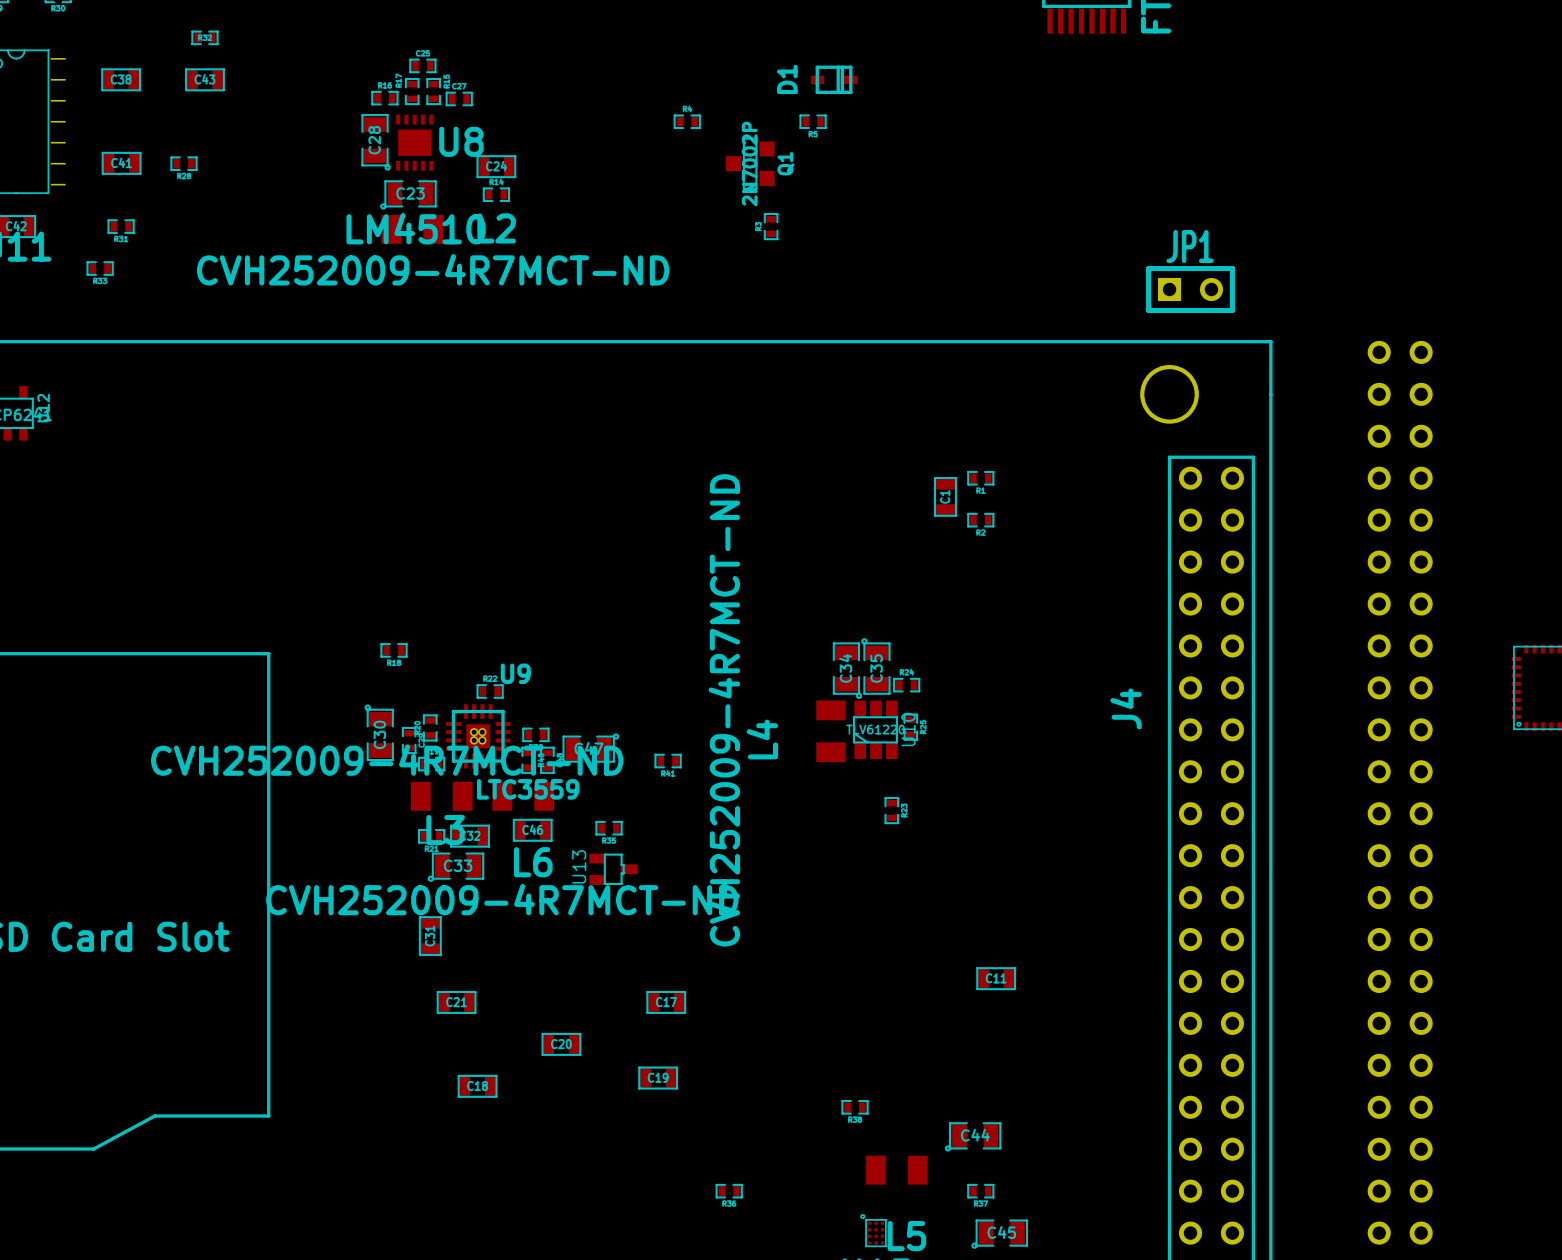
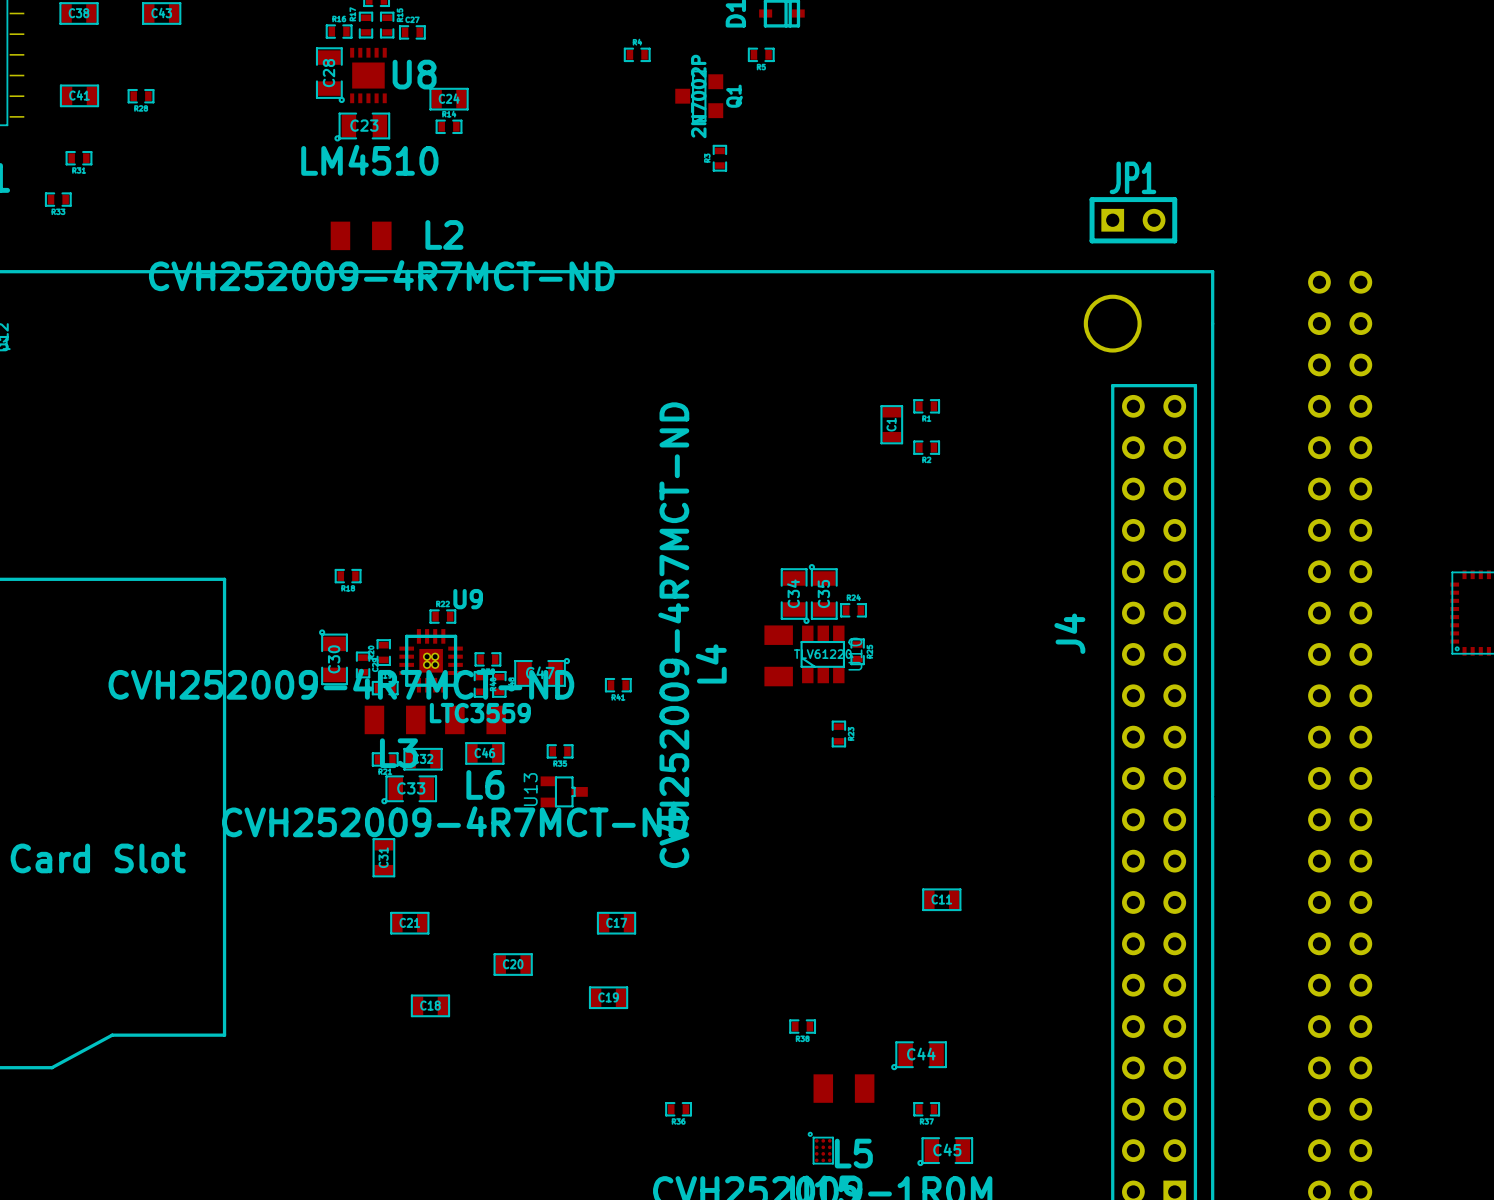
L2 position: (412, 229) -> (361, 235)

